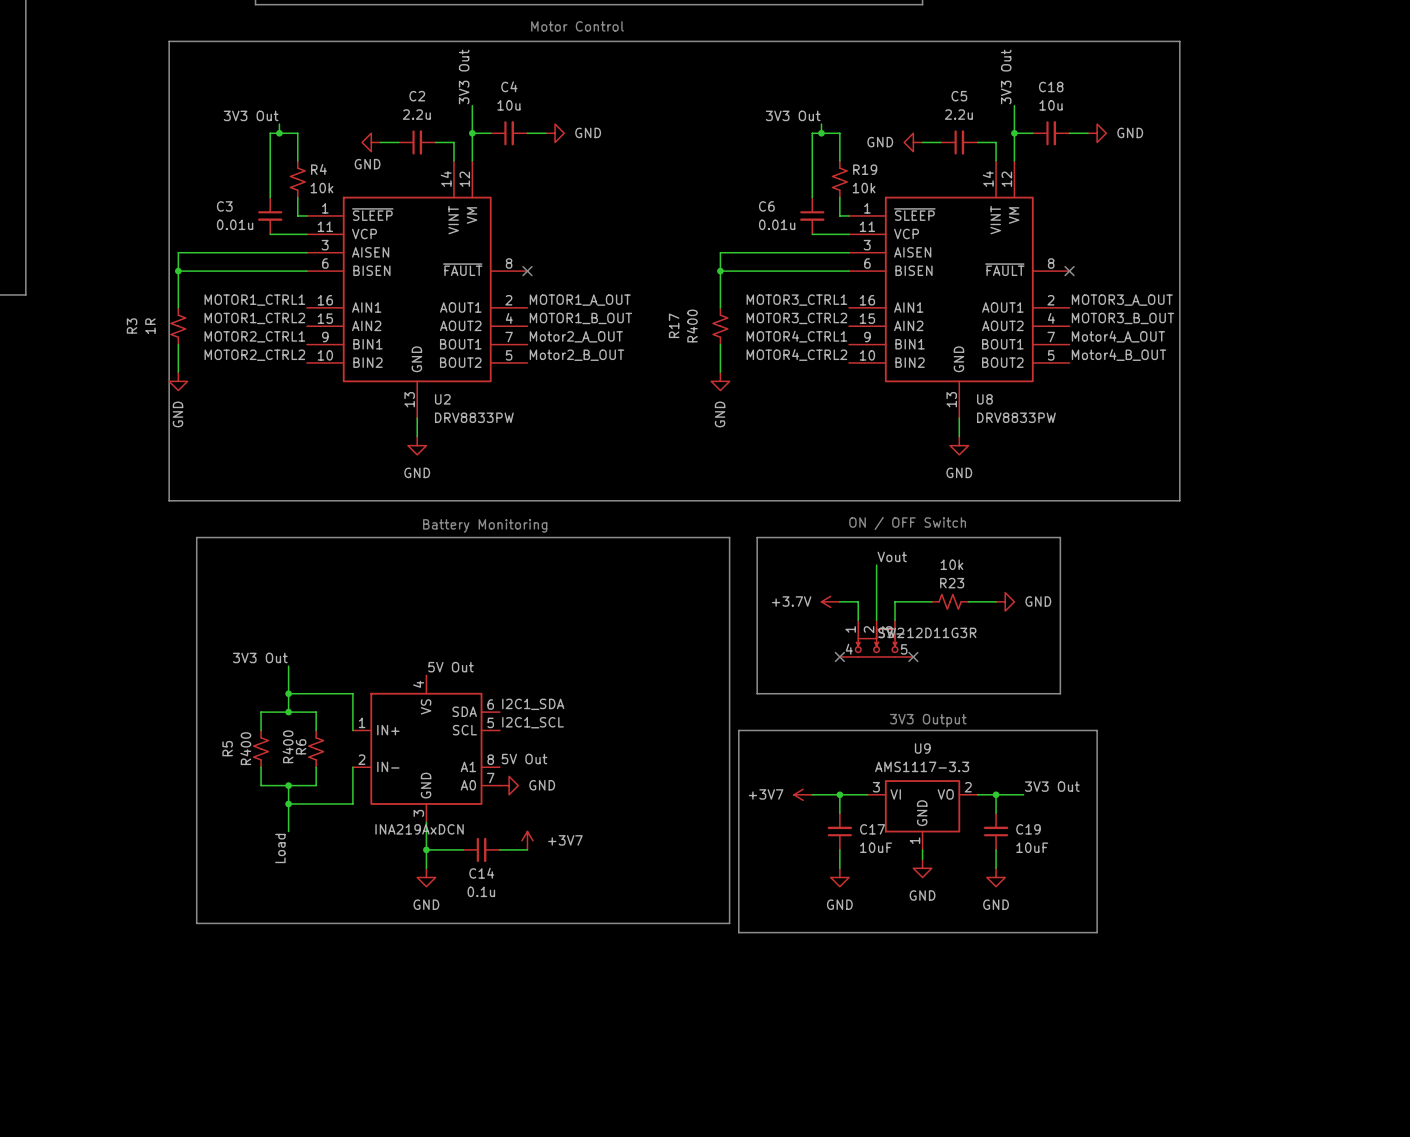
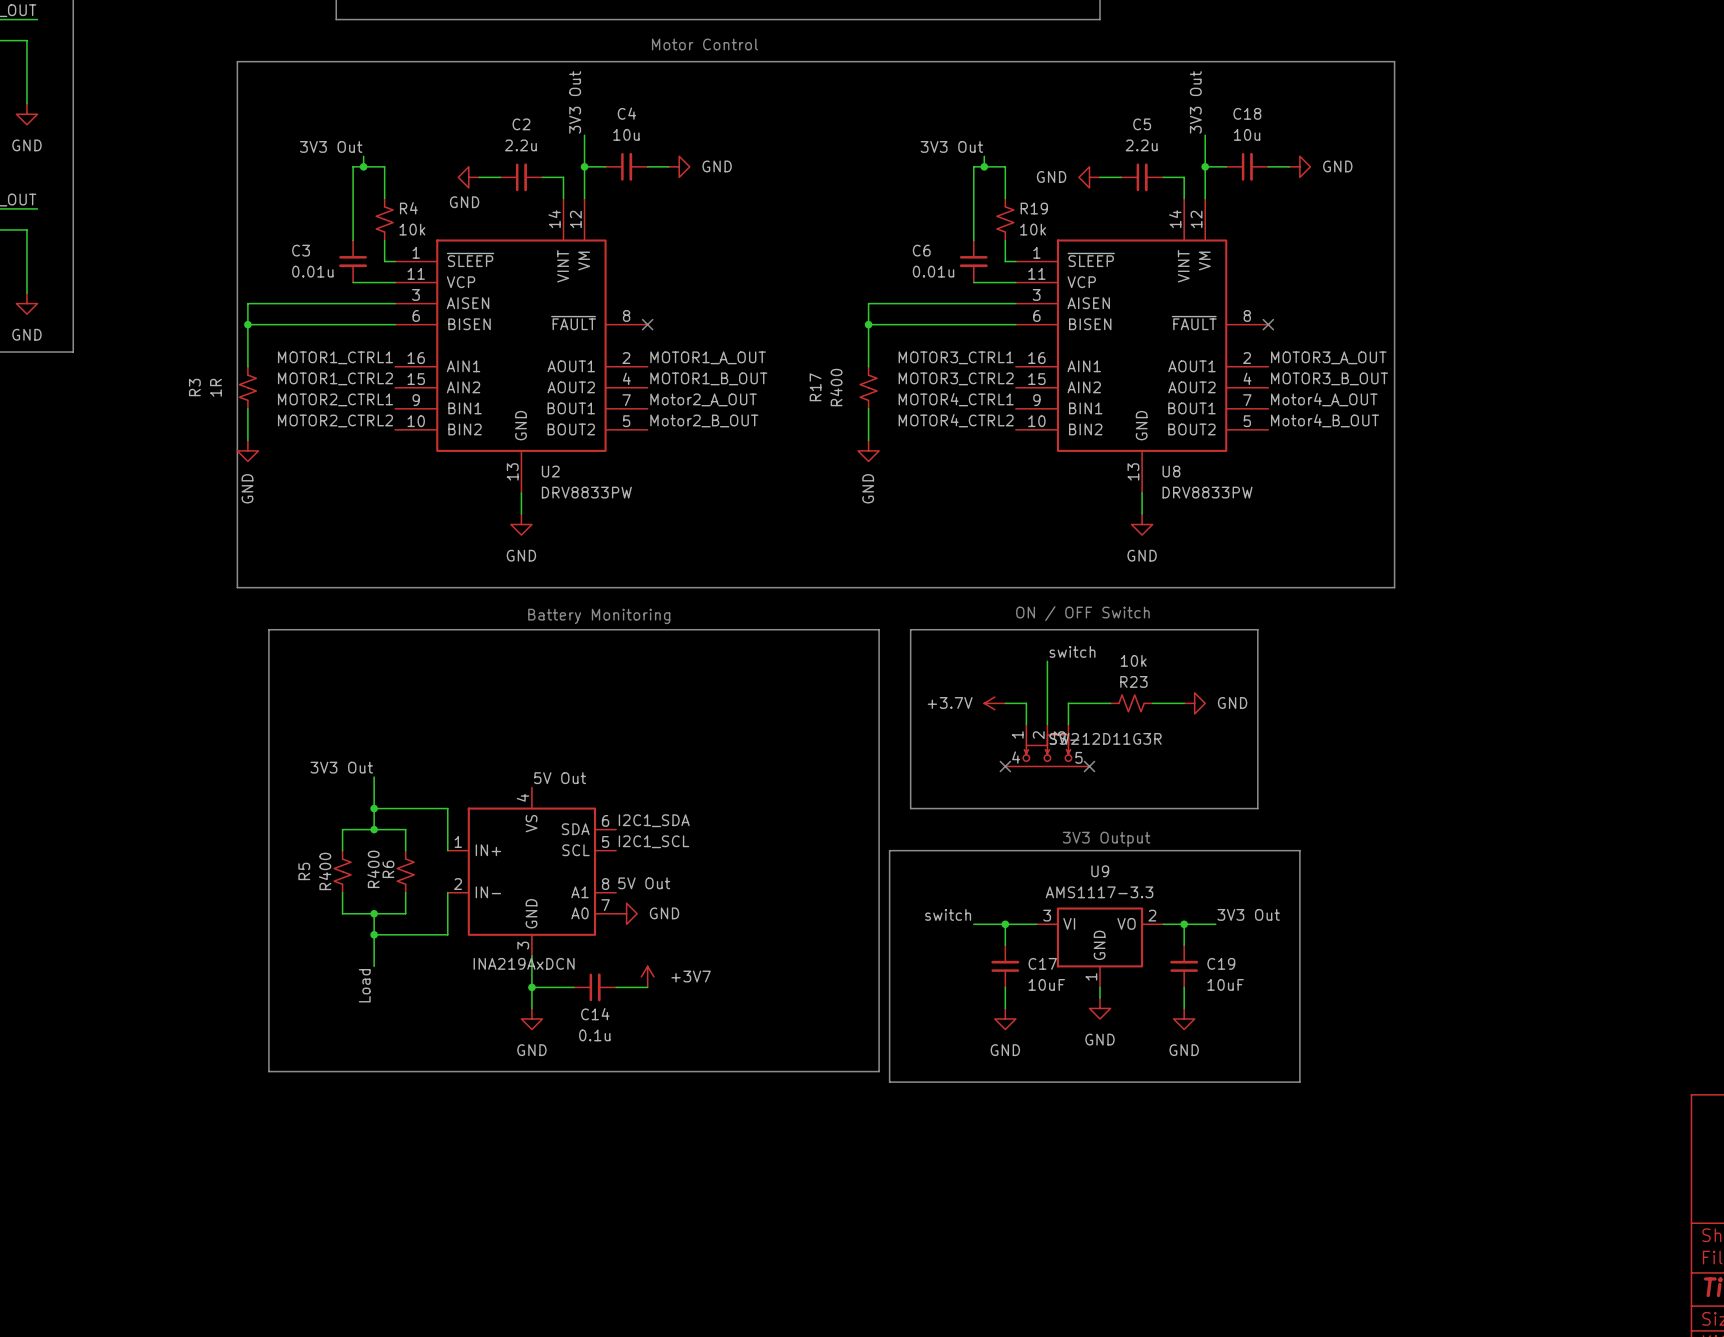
label: Vout (892, 556) -> switch (1072, 651)
label: none -> switch (948, 914)
power symbol: +3V7 (803, 794) -> none

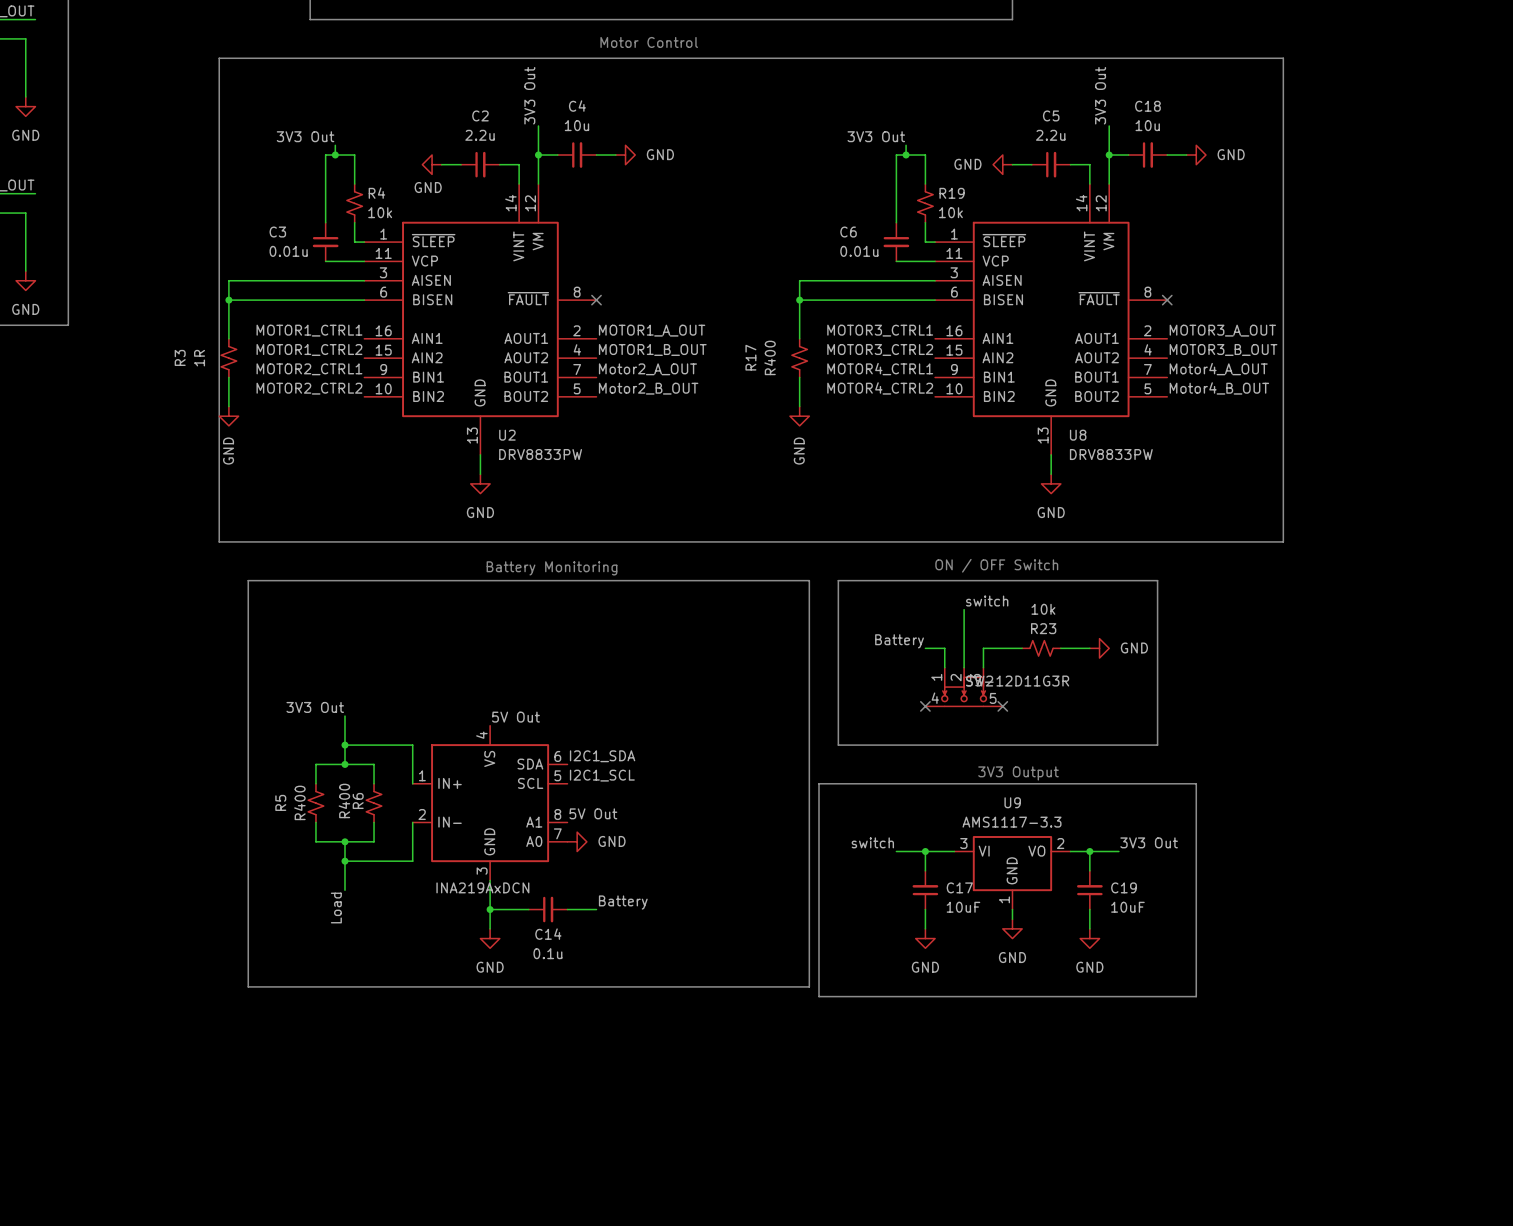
label: none -> Battery (899, 641)
power symbol: +3.7V (994, 703) -> none
power symbol: +3V7 (647, 976) -> none
label: none -> Battery (623, 902)

